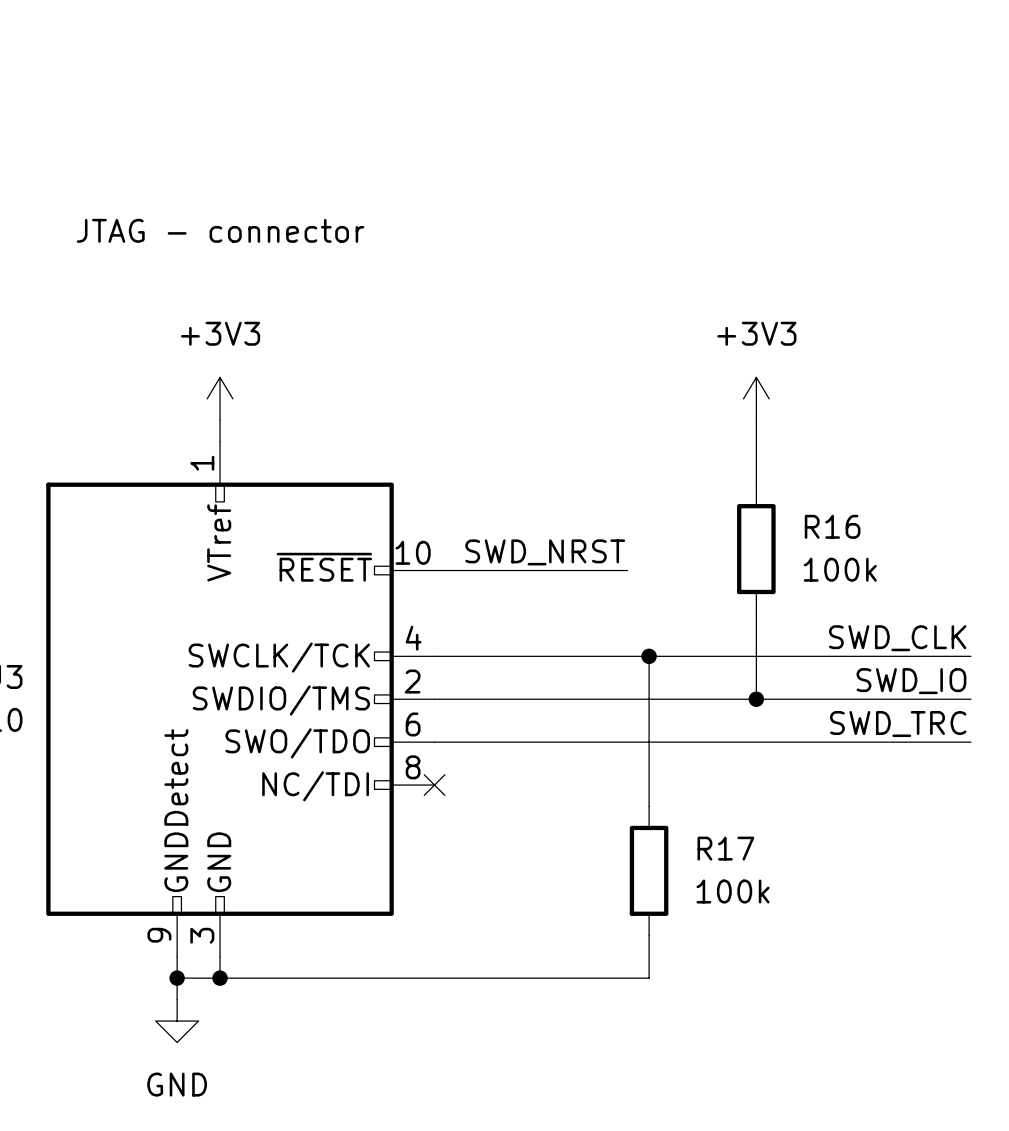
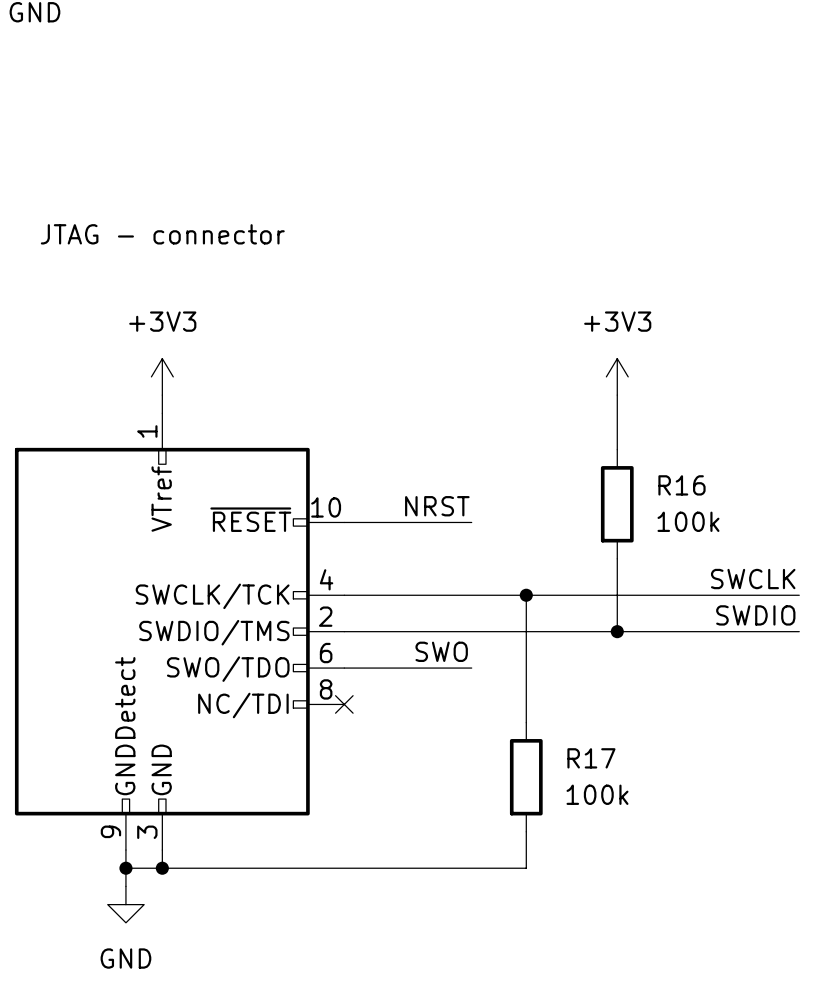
label: SWD_NRST (545, 552) -> NRST (437, 506)
wire: (584, 570) (627, 570) -> none
label: SWD_CLK (897, 638) -> SWCLK (753, 579)
label: SWD_IO (911, 681) -> SWDIO (755, 615)
label: none -> SWO (441, 651)
label: SWD_TRC (898, 724) -> none
wire: (584, 742) (970, 742) -> none

